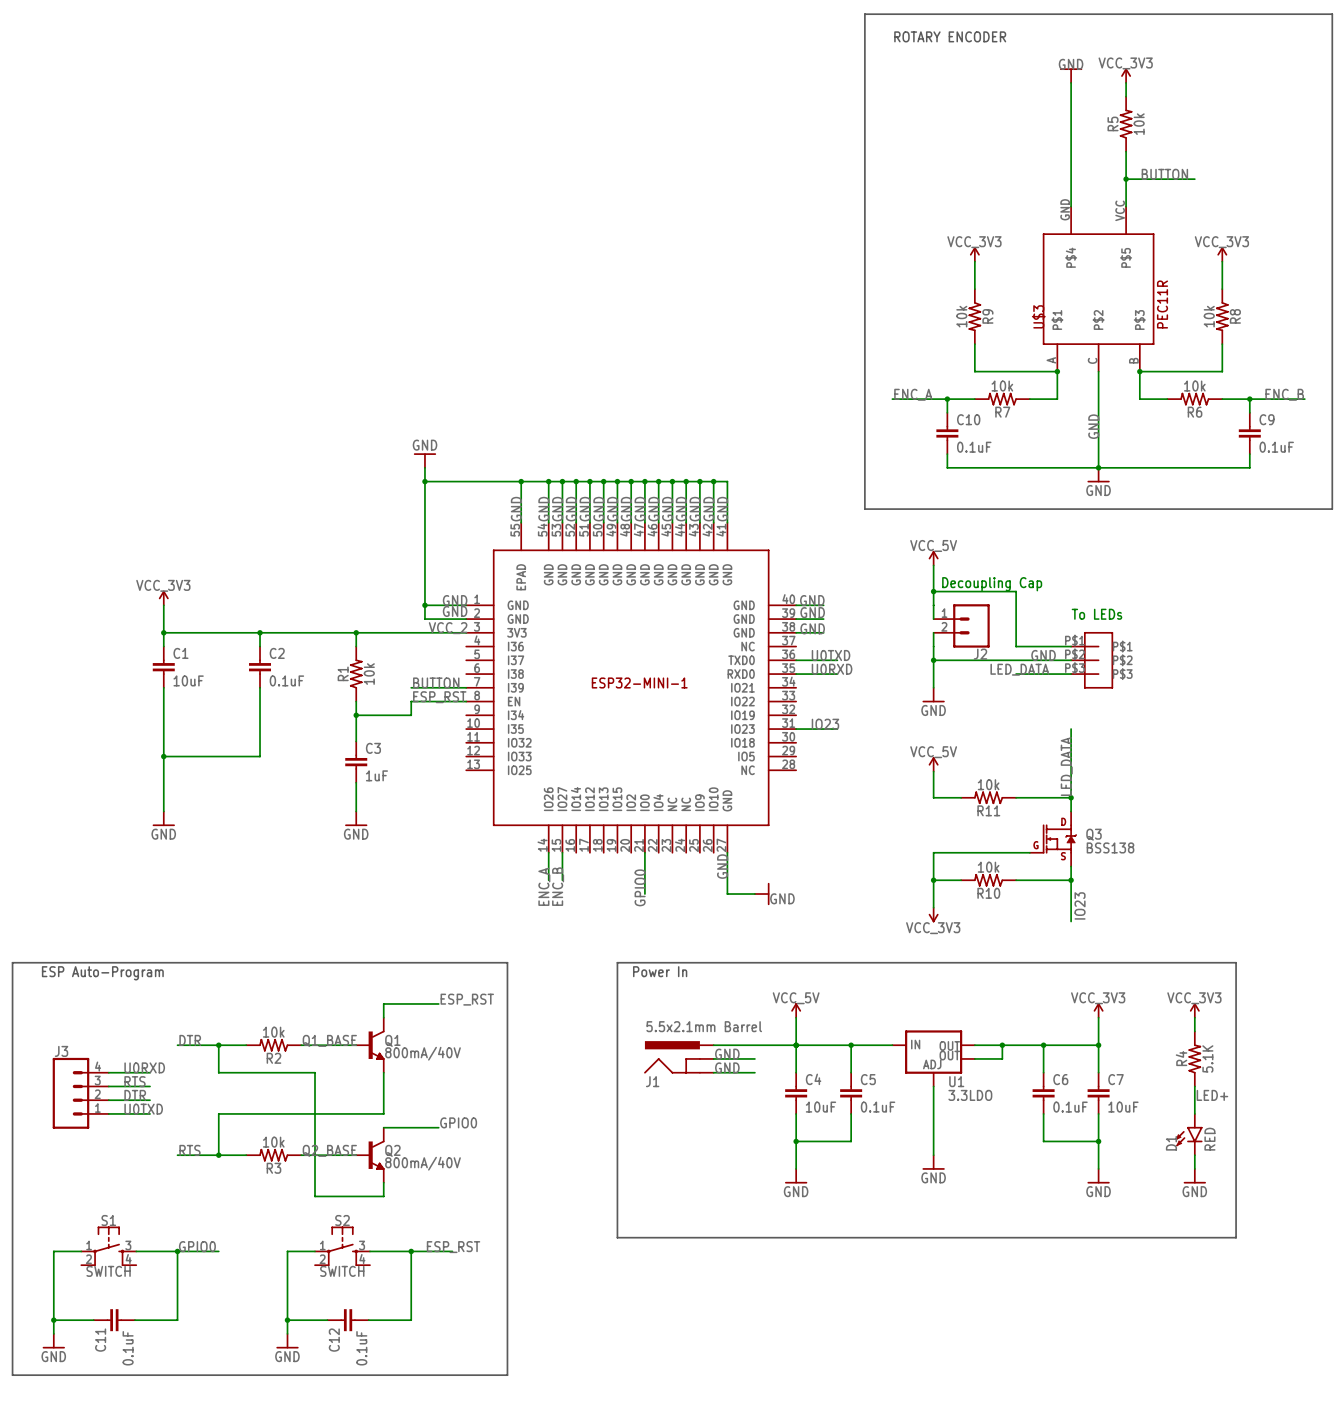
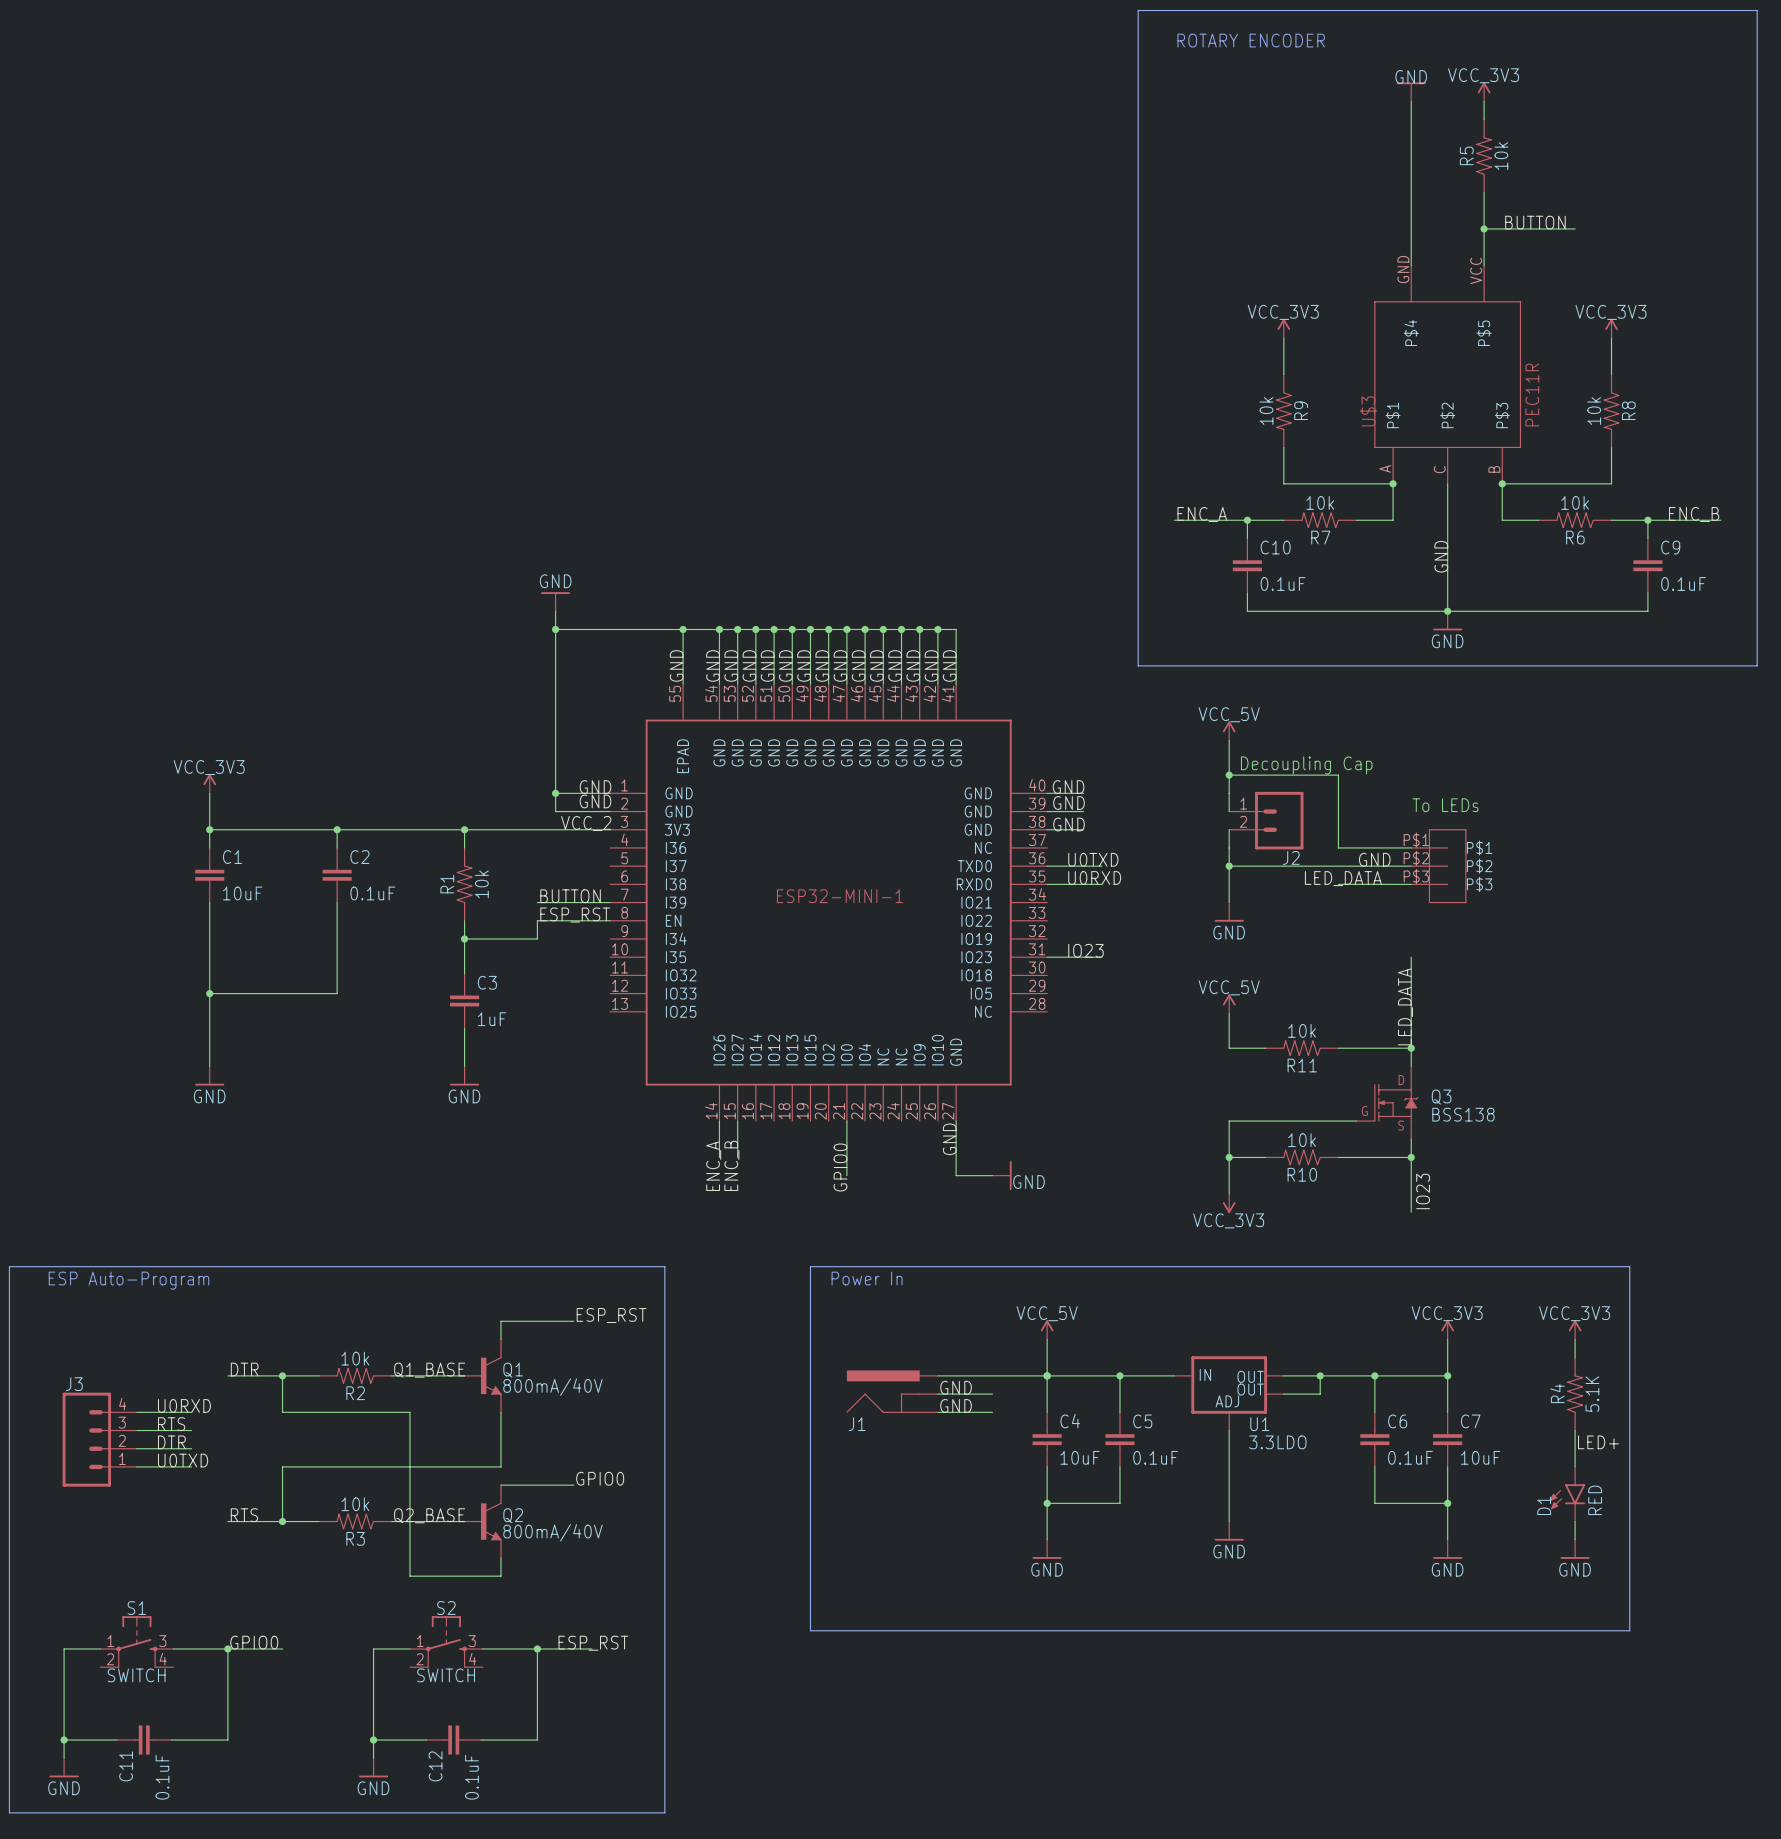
J1 value: 5.5x2.1mm Barrel (704, 1026) -> none

